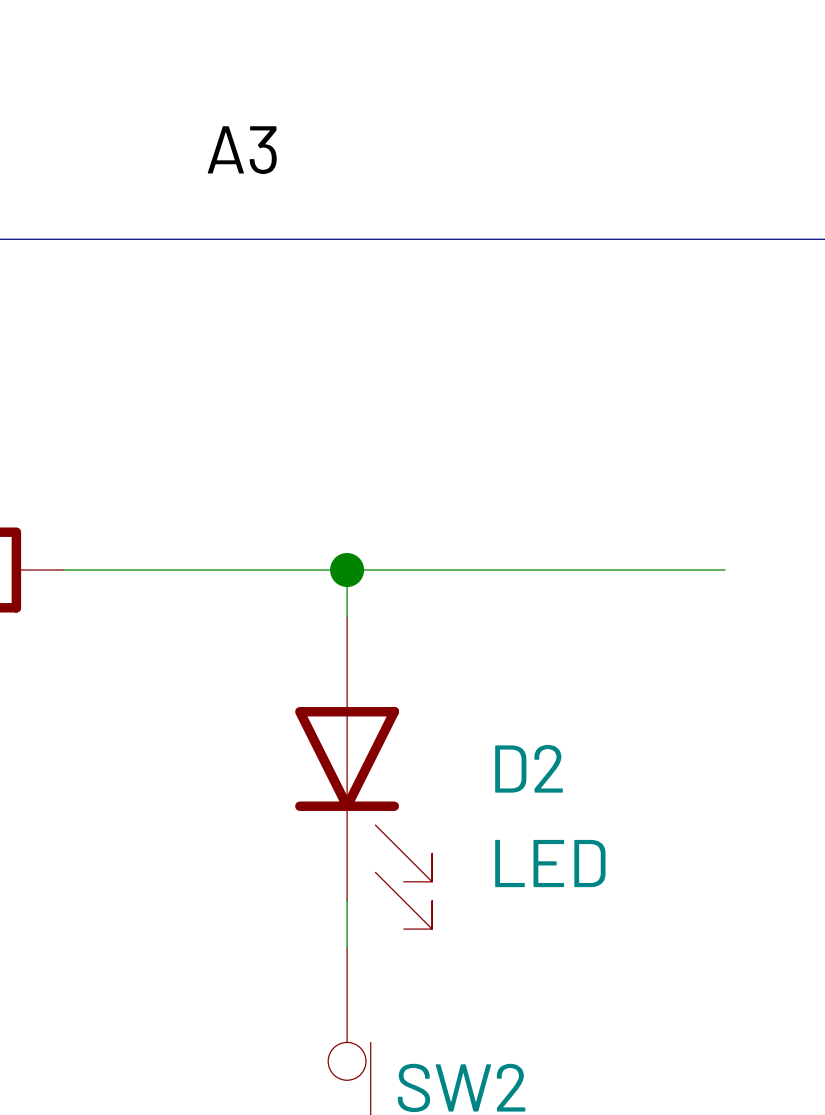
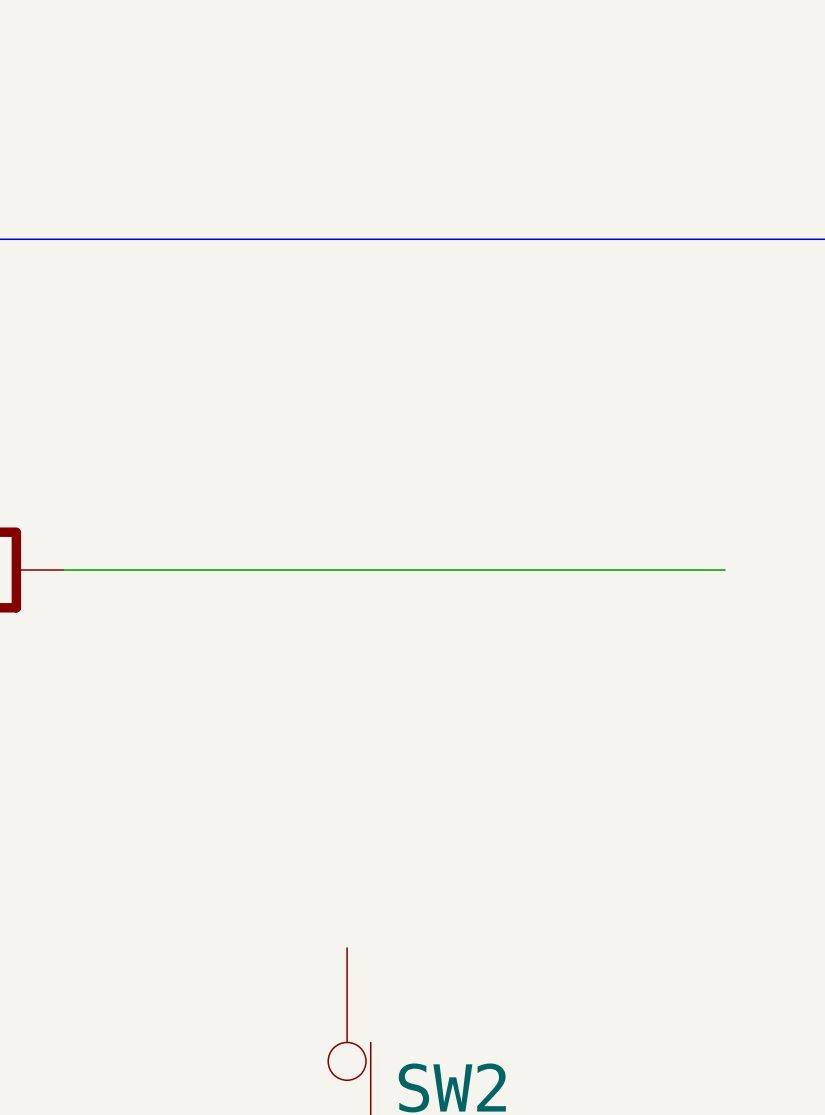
label: A3 (242, 150) -> none
wire: (347, 570) (347, 617) -> none
junction: (347, 570) -> none
D2: LED (363, 773) -> none
wire: (347, 900) (347, 947) -> none

